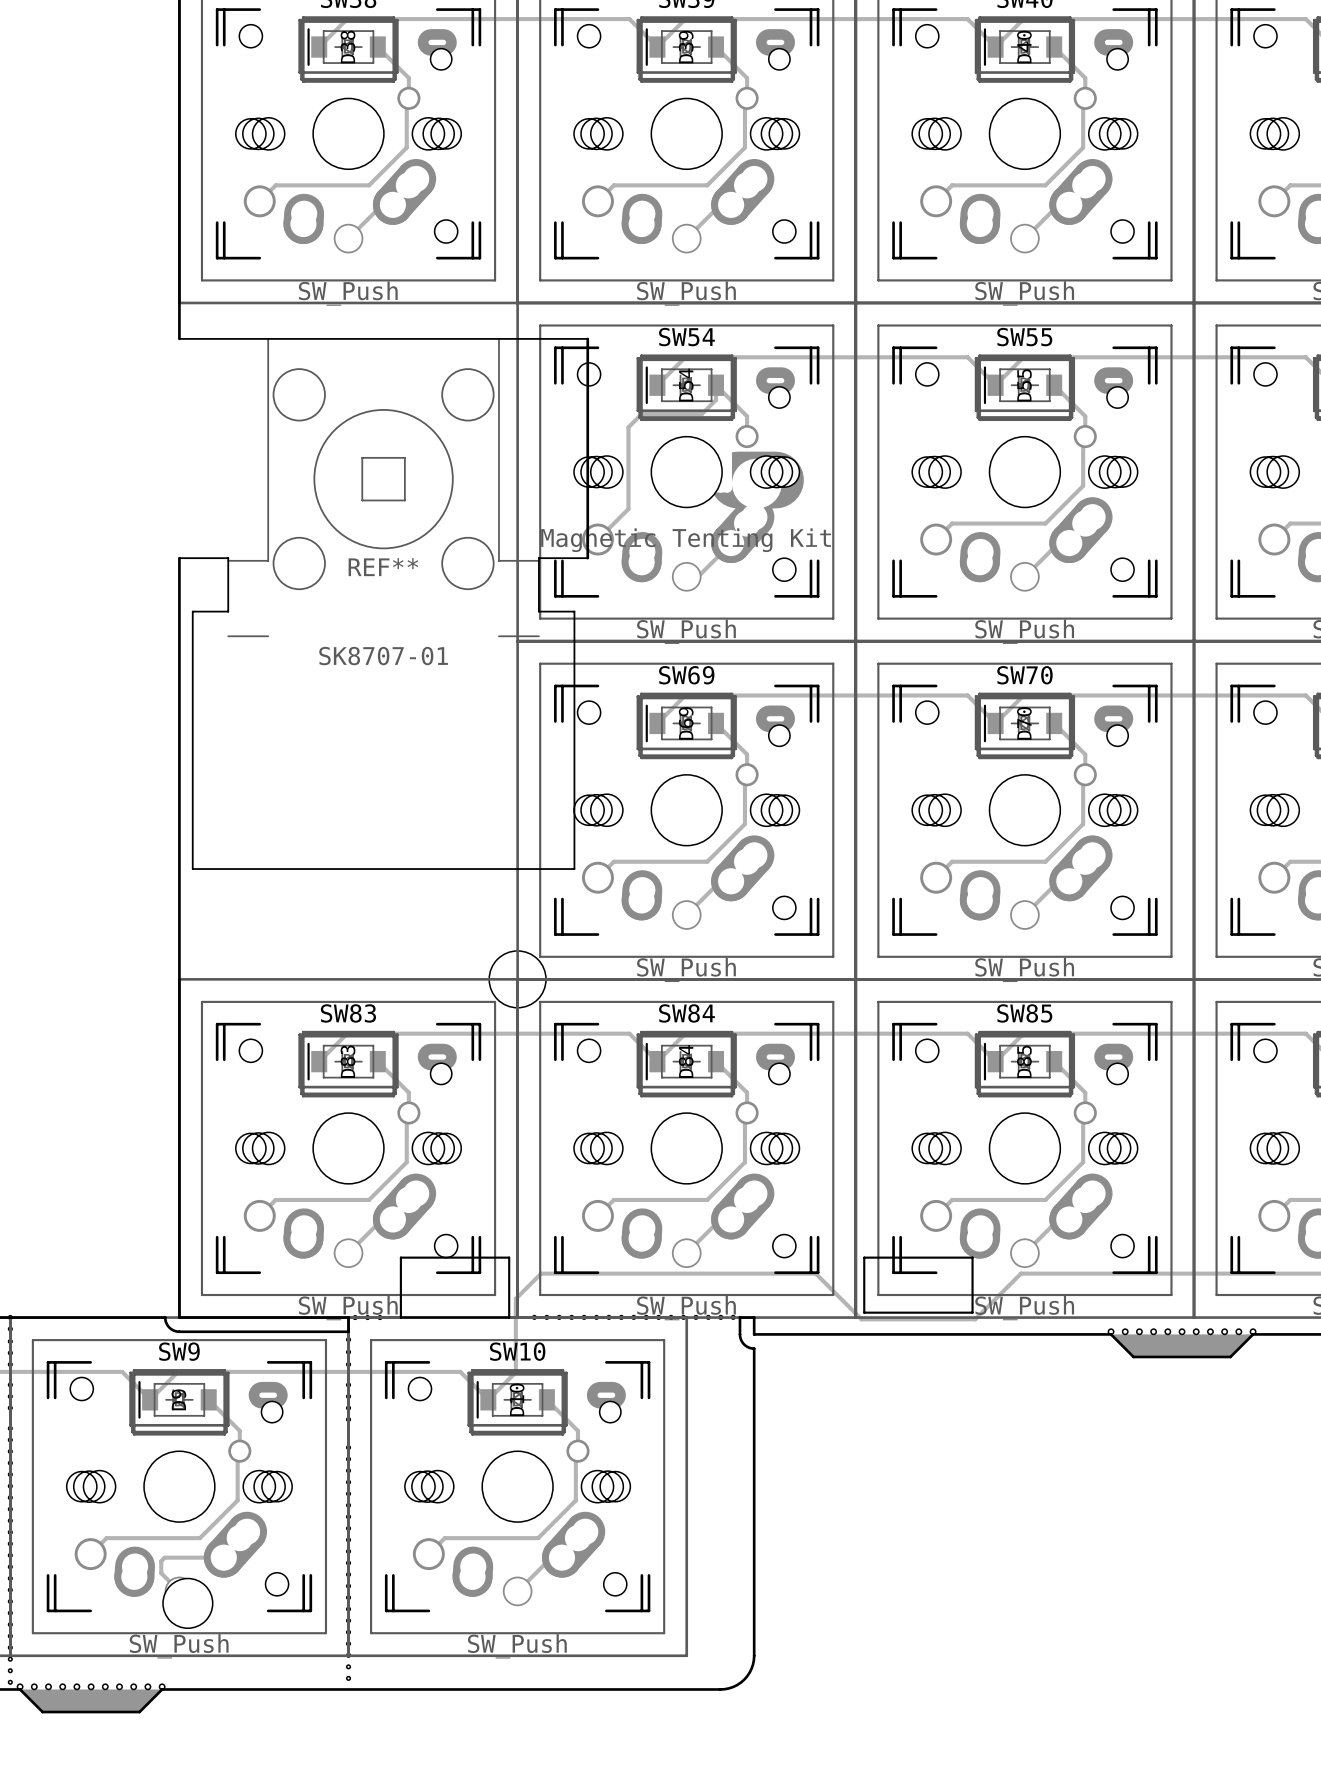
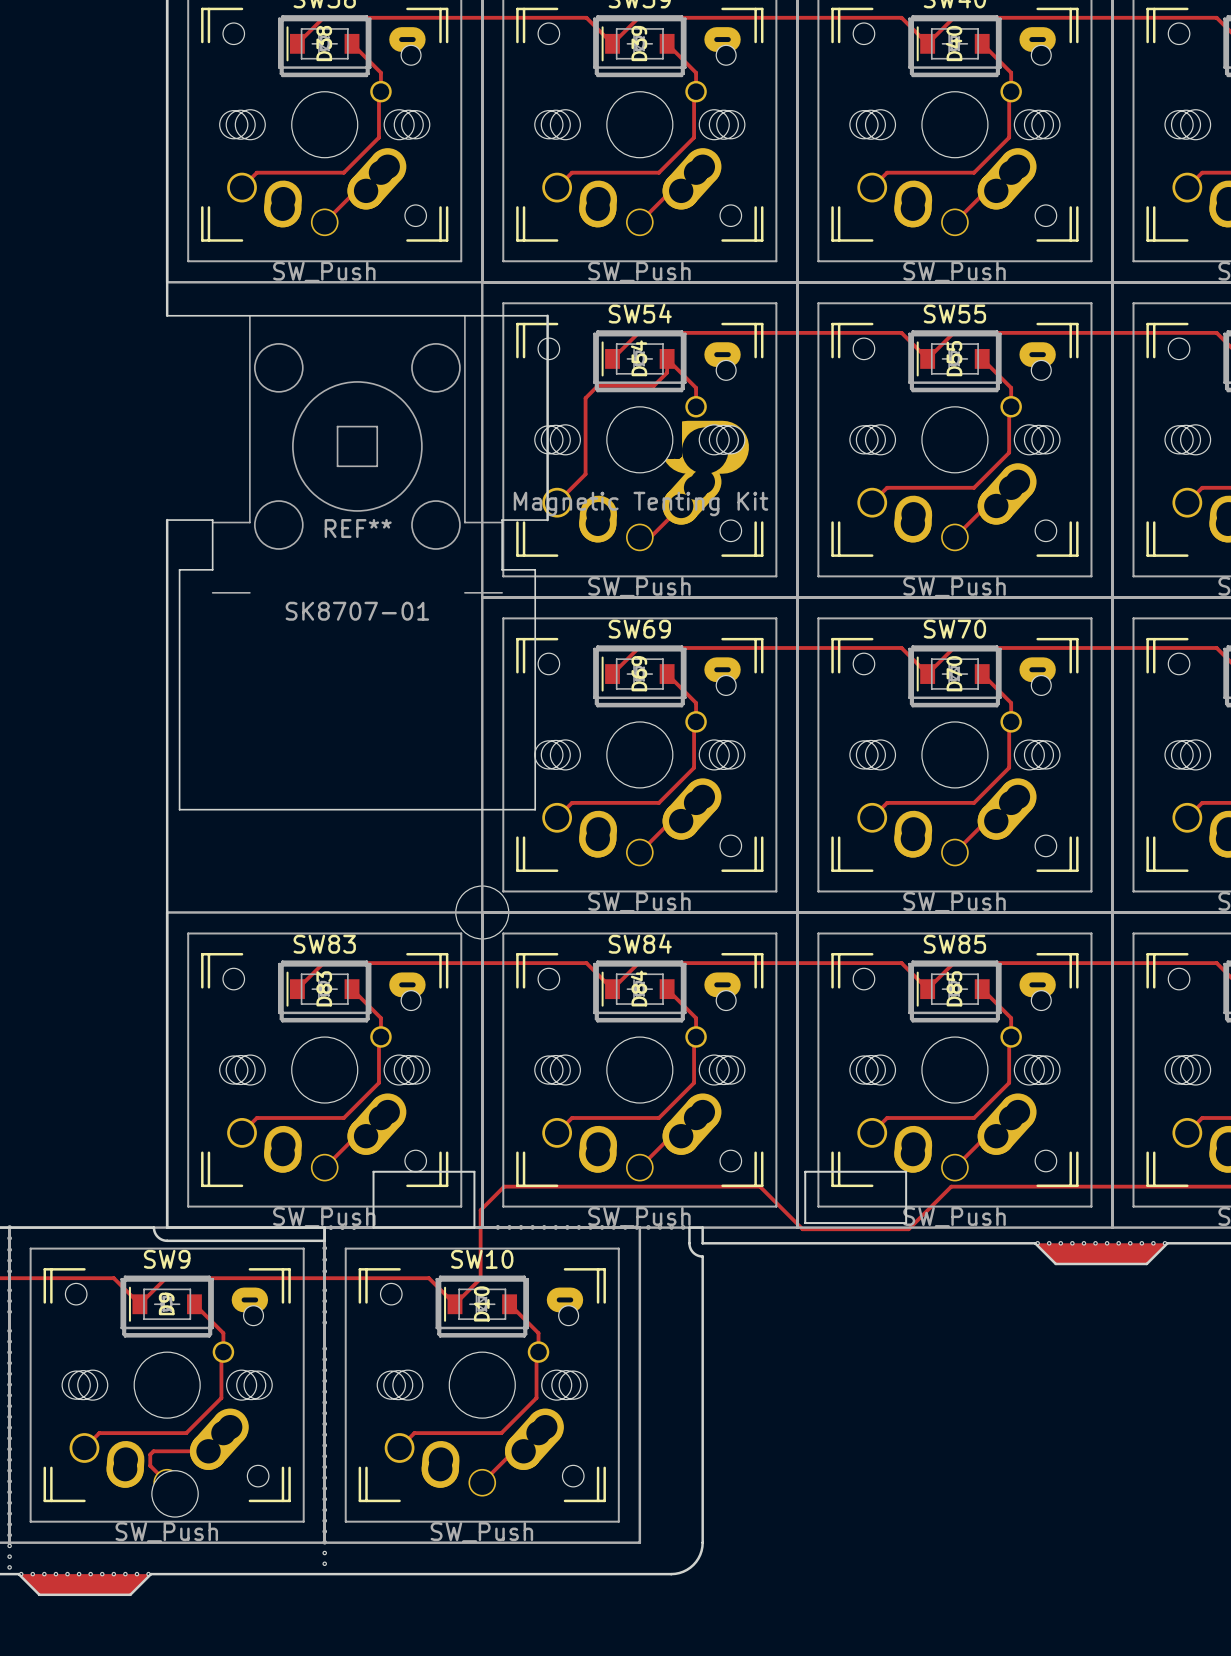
part footprint: [1108, 1329, 1256, 1359] -> [1033, 1241, 1169, 1266]
part footprint: [17, 1684, 165, 1714] -> [17, 1572, 153, 1597]

